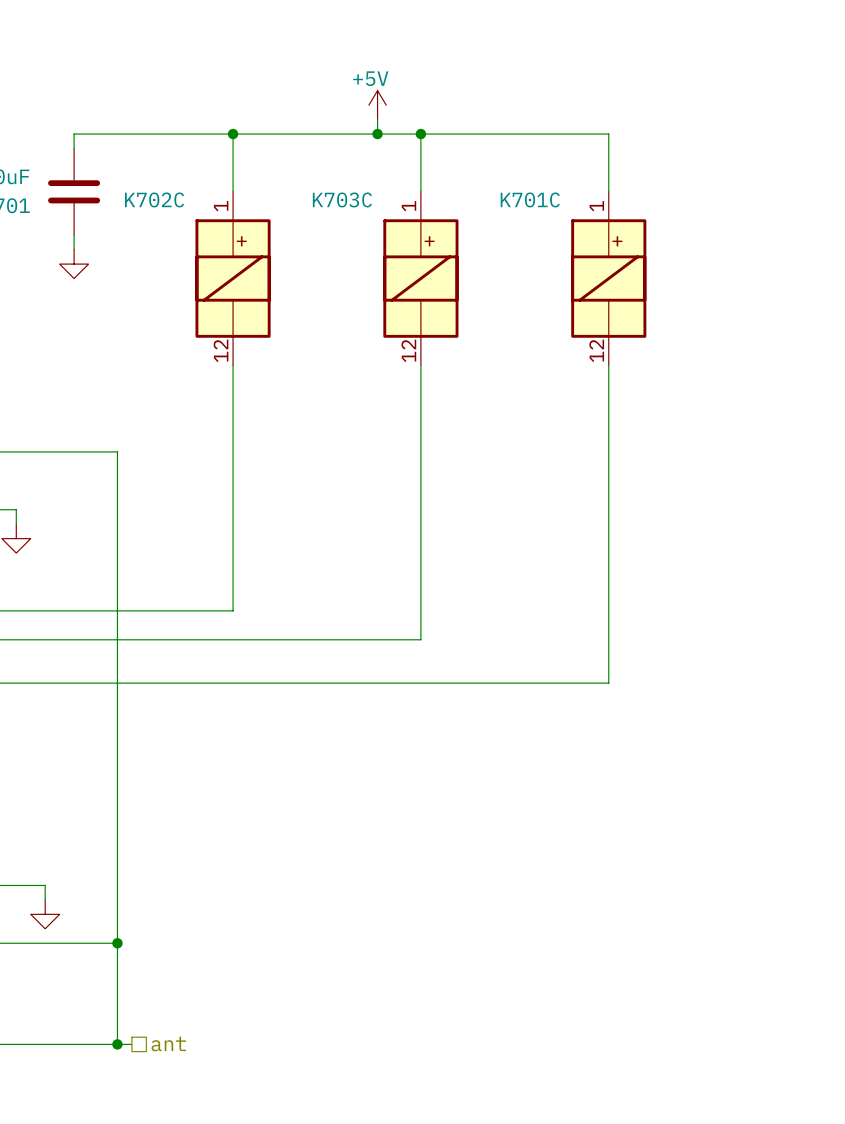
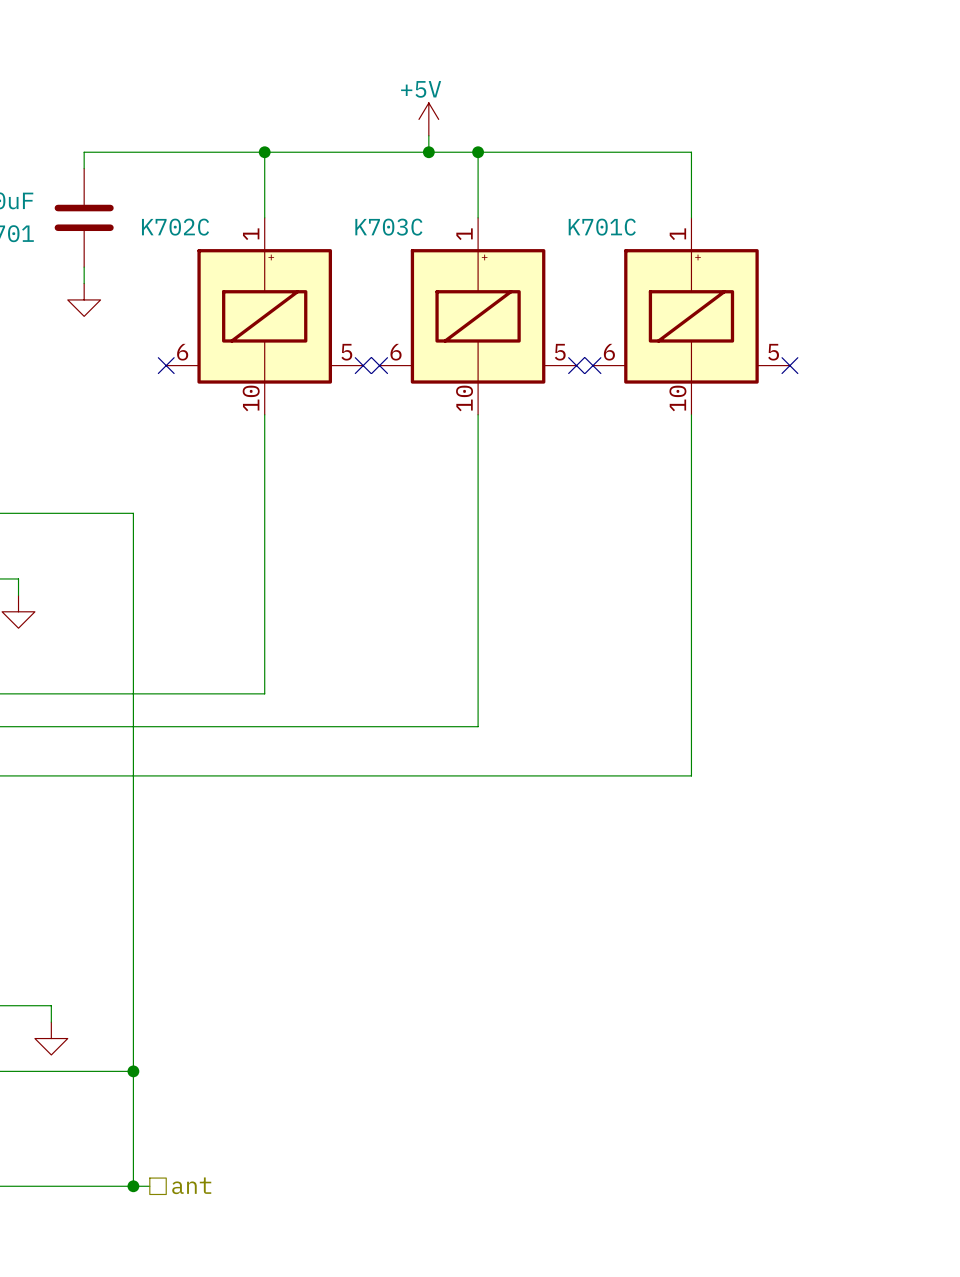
K702C symbol: [195, 191, 271, 366] -> [166, 217, 364, 415]
K703C symbol: [383, 191, 459, 366] -> [379, 217, 577, 415]
K701C symbol: [571, 191, 647, 366] -> [592, 217, 790, 415]
no-connect mark: none -> (166, 365)
no-connect mark: none -> (363, 365)
no-connect mark: none -> (379, 365)
no-connect mark: none -> (576, 365)
no-connect mark: none -> (592, 365)
no-connect mark: none -> (789, 365)

